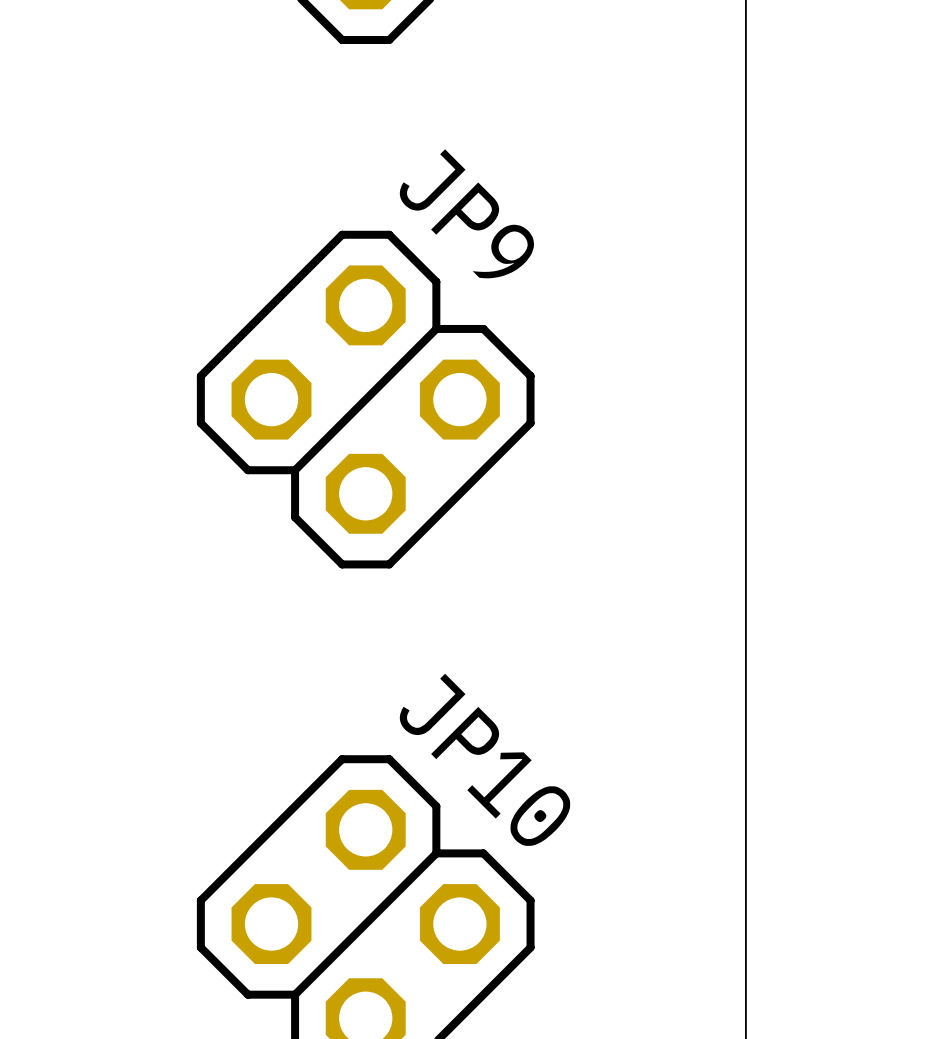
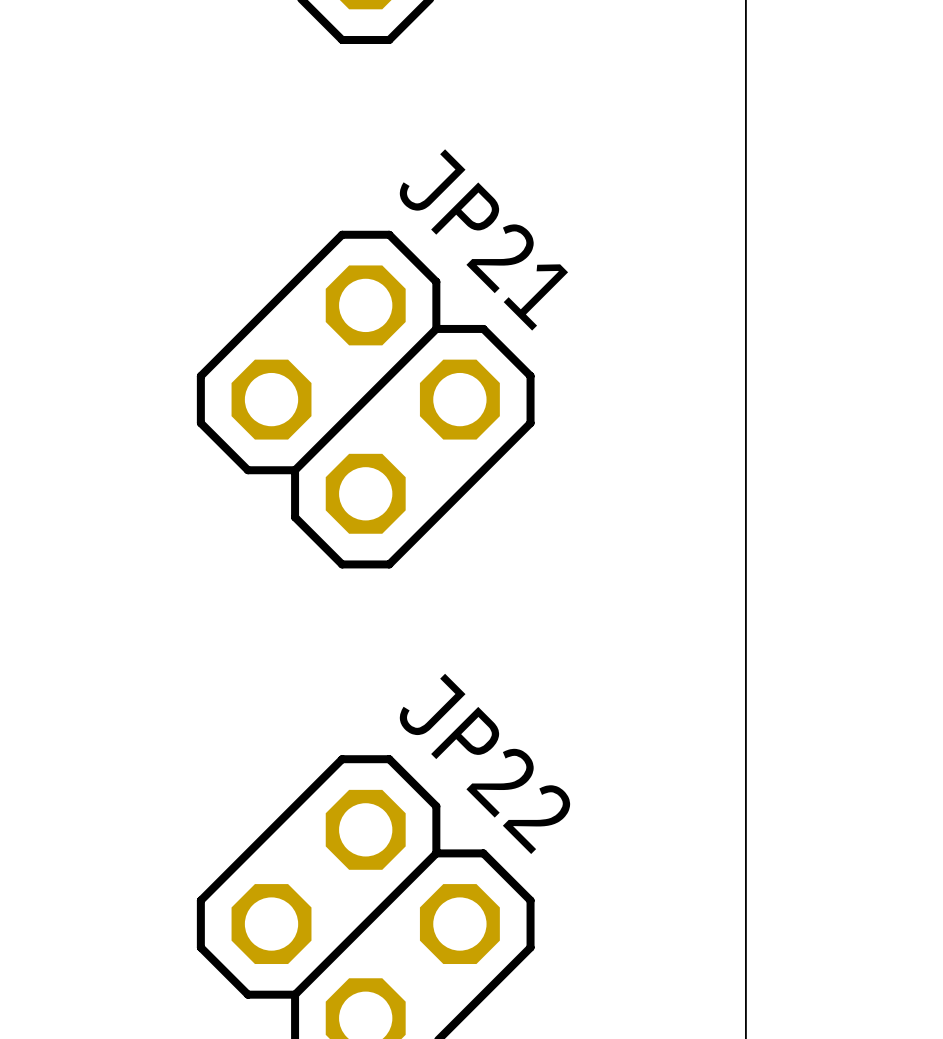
JP9 name: JP9 (466, 213) -> JP21 (483, 239)
JP10 name: JP10 (485, 760) -> JP22 (484, 763)

